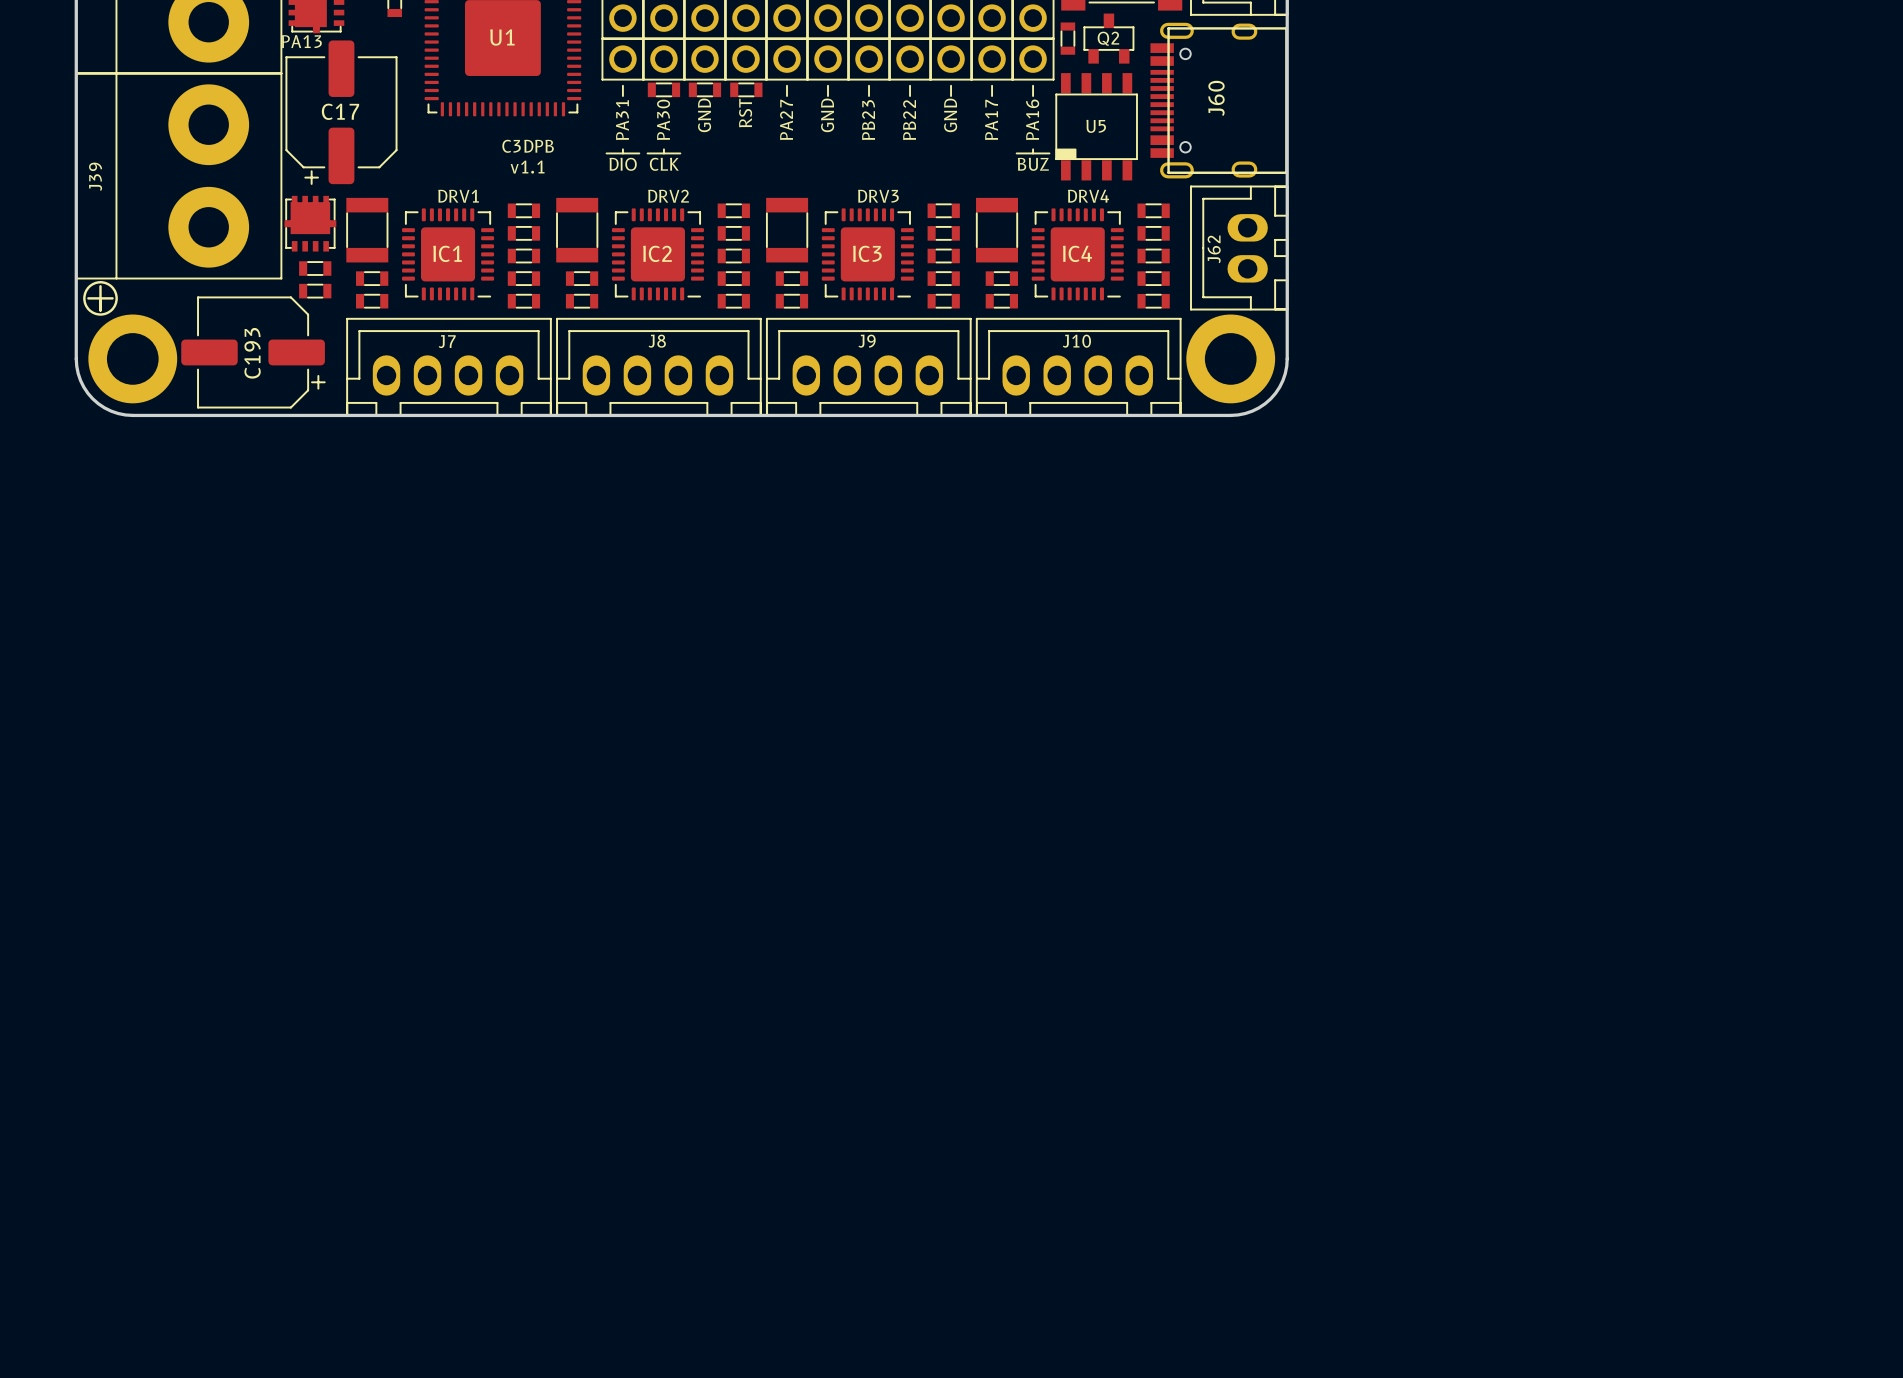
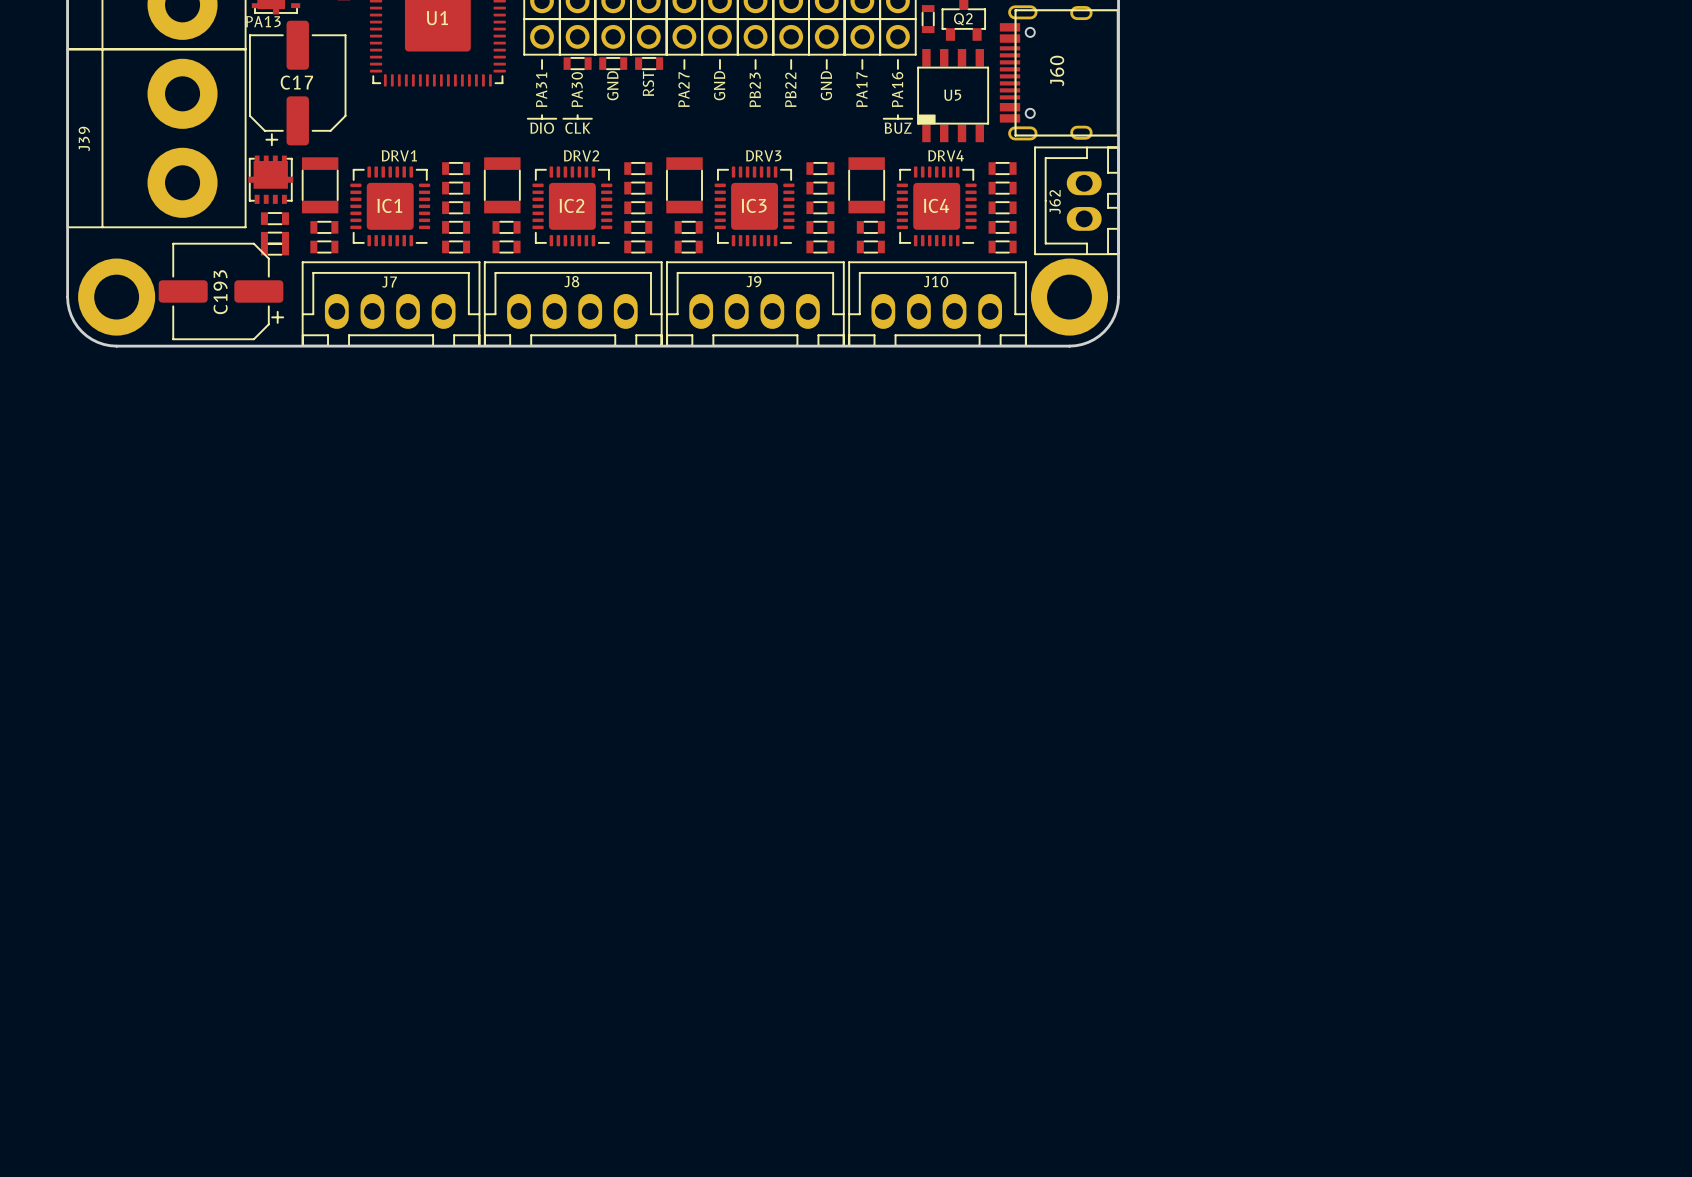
text: C3DPB (528, 146) -> none
text: v1.1 (527, 167) -> none
drawing: [83, 281, 118, 316] -> none
line: (100, 286) (100, 310) -> none
line: (88, 298) (112, 298) -> none
part: none -> (274, 249)

